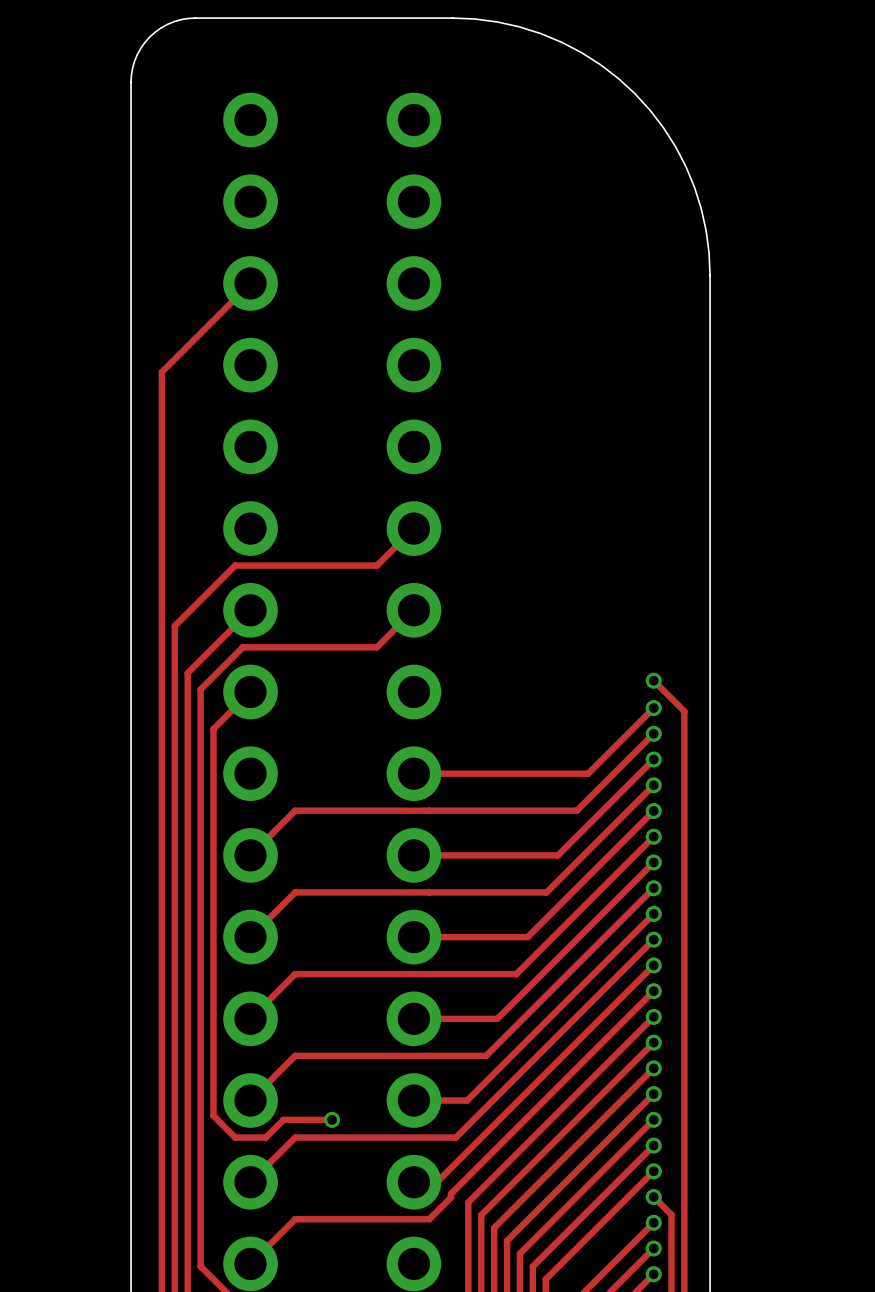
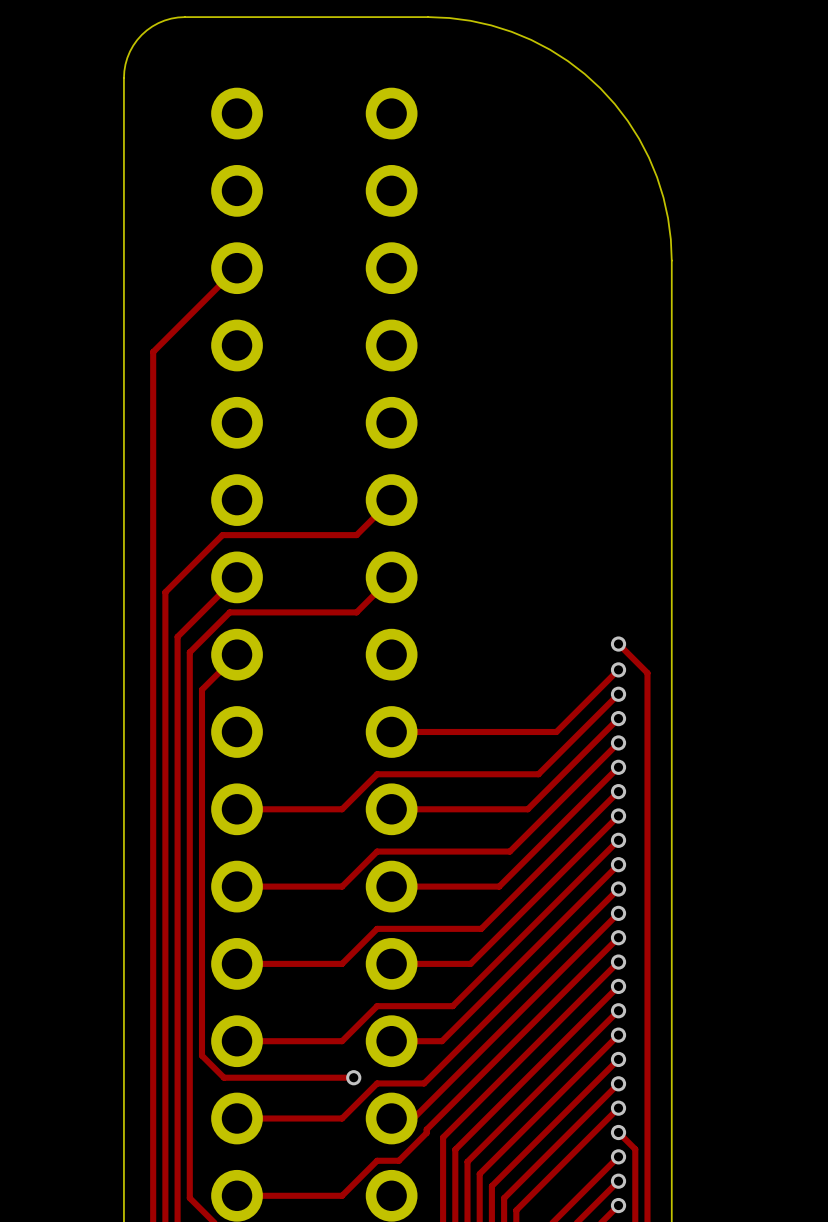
track: (576, 810) (295, 810) (250, 855) -> (545, 767) (538, 774) (377, 774) (342, 809) (237, 809)
track: (546, 892) (295, 892) (250, 937) -> (517, 844) (509, 851) (377, 851) (342, 886) (237, 886)
track: (516, 974) (295, 974) (250, 1018) -> (488, 921) (481, 928) (377, 928) (342, 963) (237, 963)
track: (486, 1055) (295, 1055) (250, 1100) -> (459, 998) (452, 1006) (377, 1006) (342, 1041) (237, 1041)
track: (332, 1119) (283, 1119) (265, 1137) (235, 1137) -> (353, 1077) (222, 1076)
via position: (332, 1119) -> (353, 1077)
track: (455, 1137) (295, 1137) (250, 1182) -> (431, 1076) (424, 1083) (377, 1083) (342, 1118) (237, 1118)
track: (429, 1219) (295, 1219) (250, 1263) -> (406, 1153) (398, 1160) (377, 1160) (342, 1195) (237, 1195)

